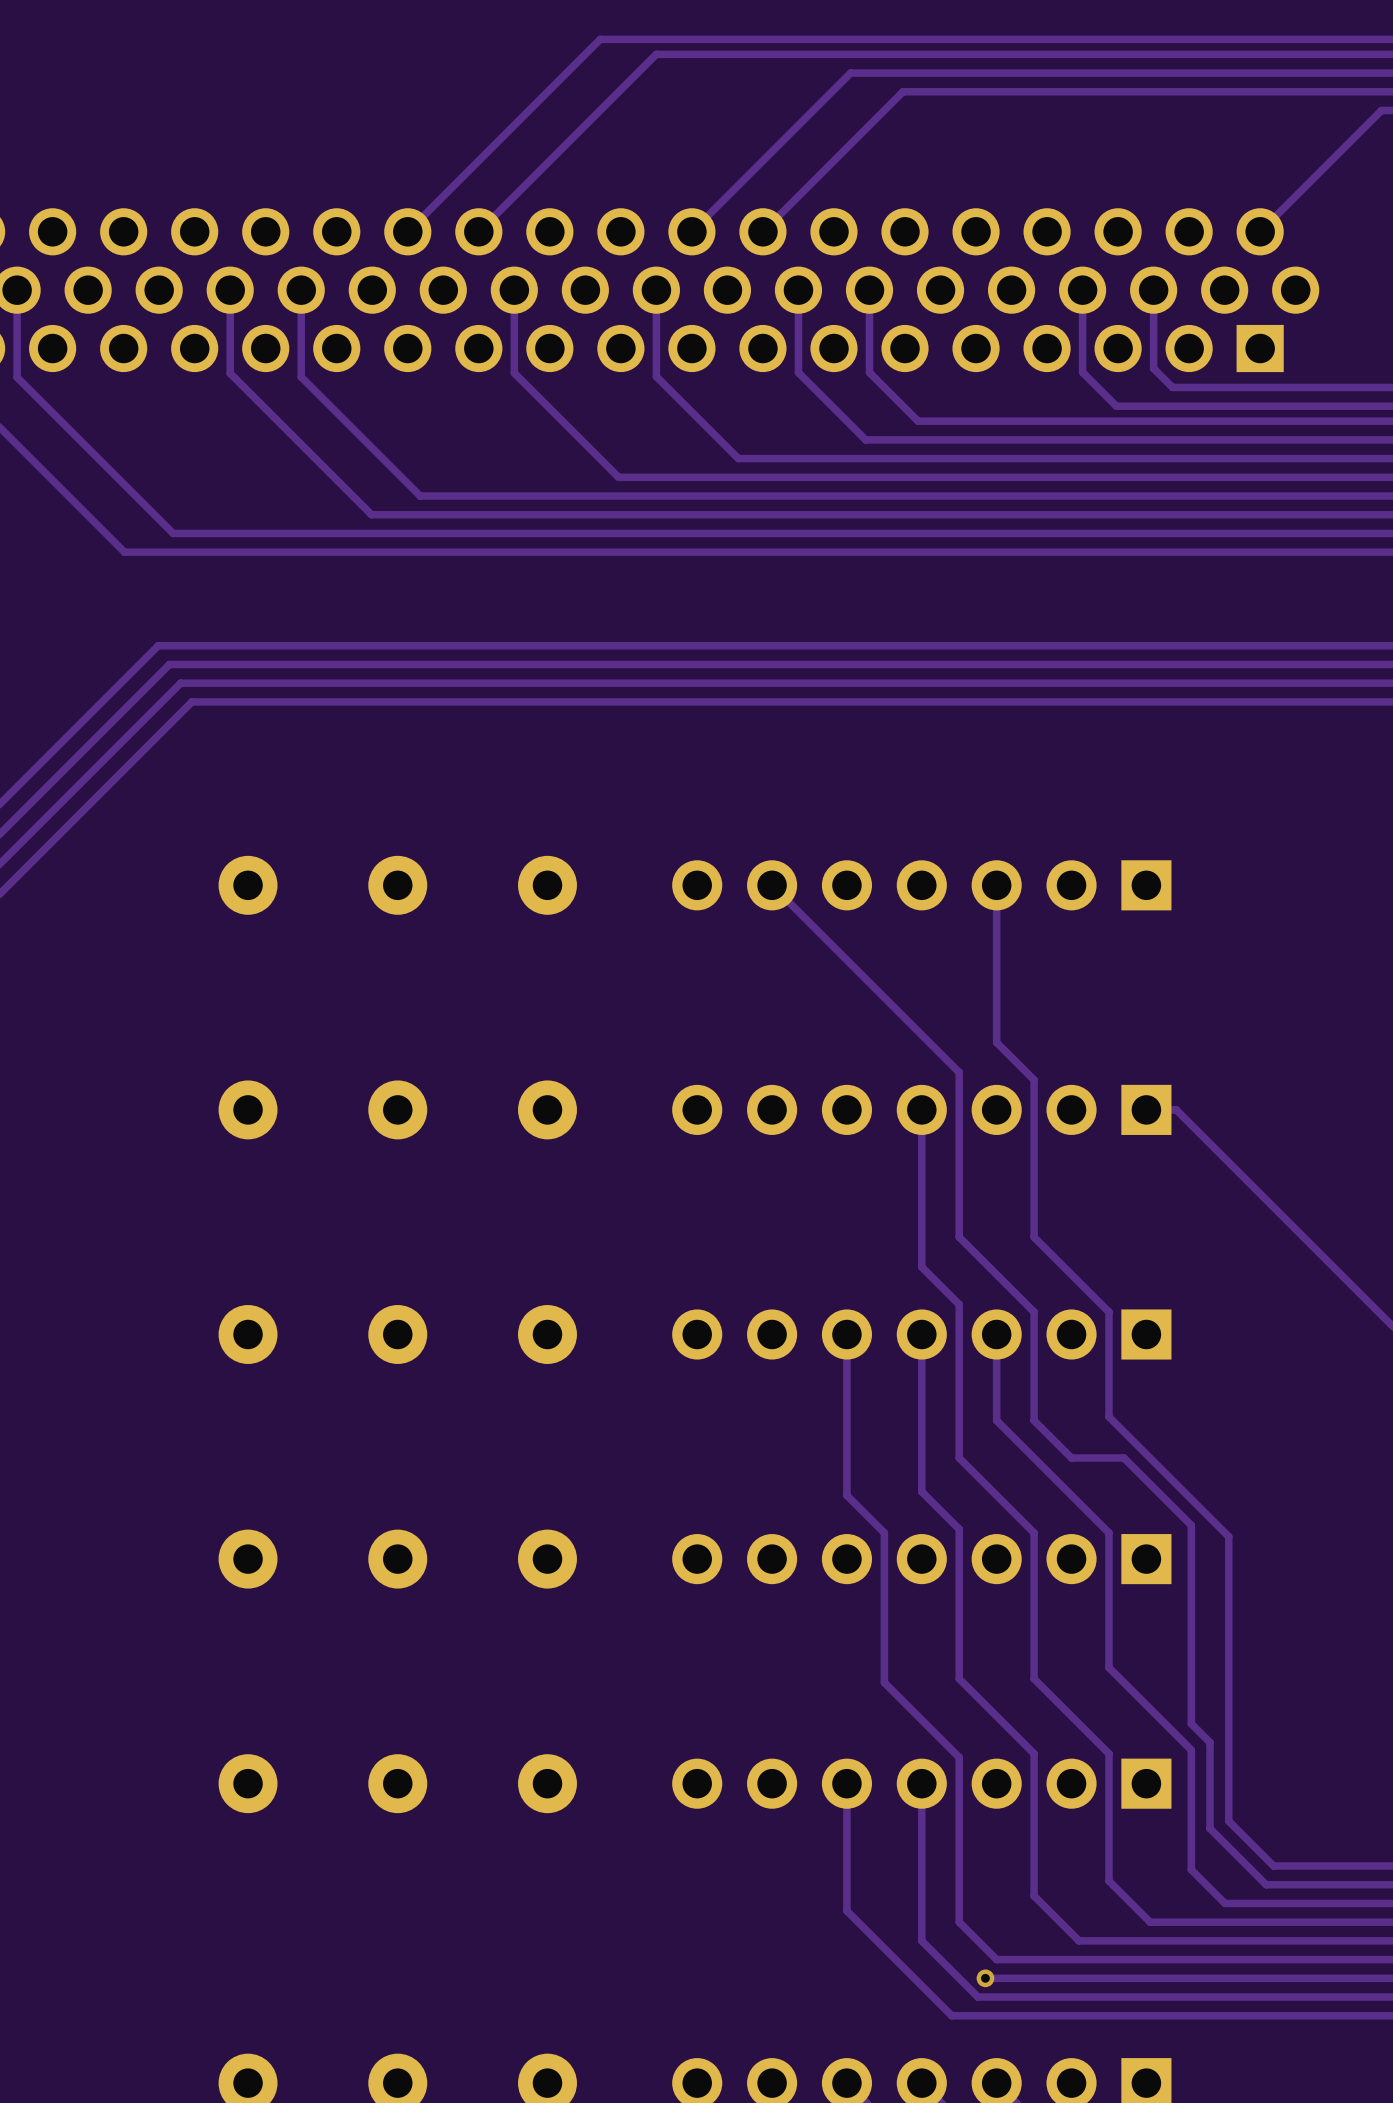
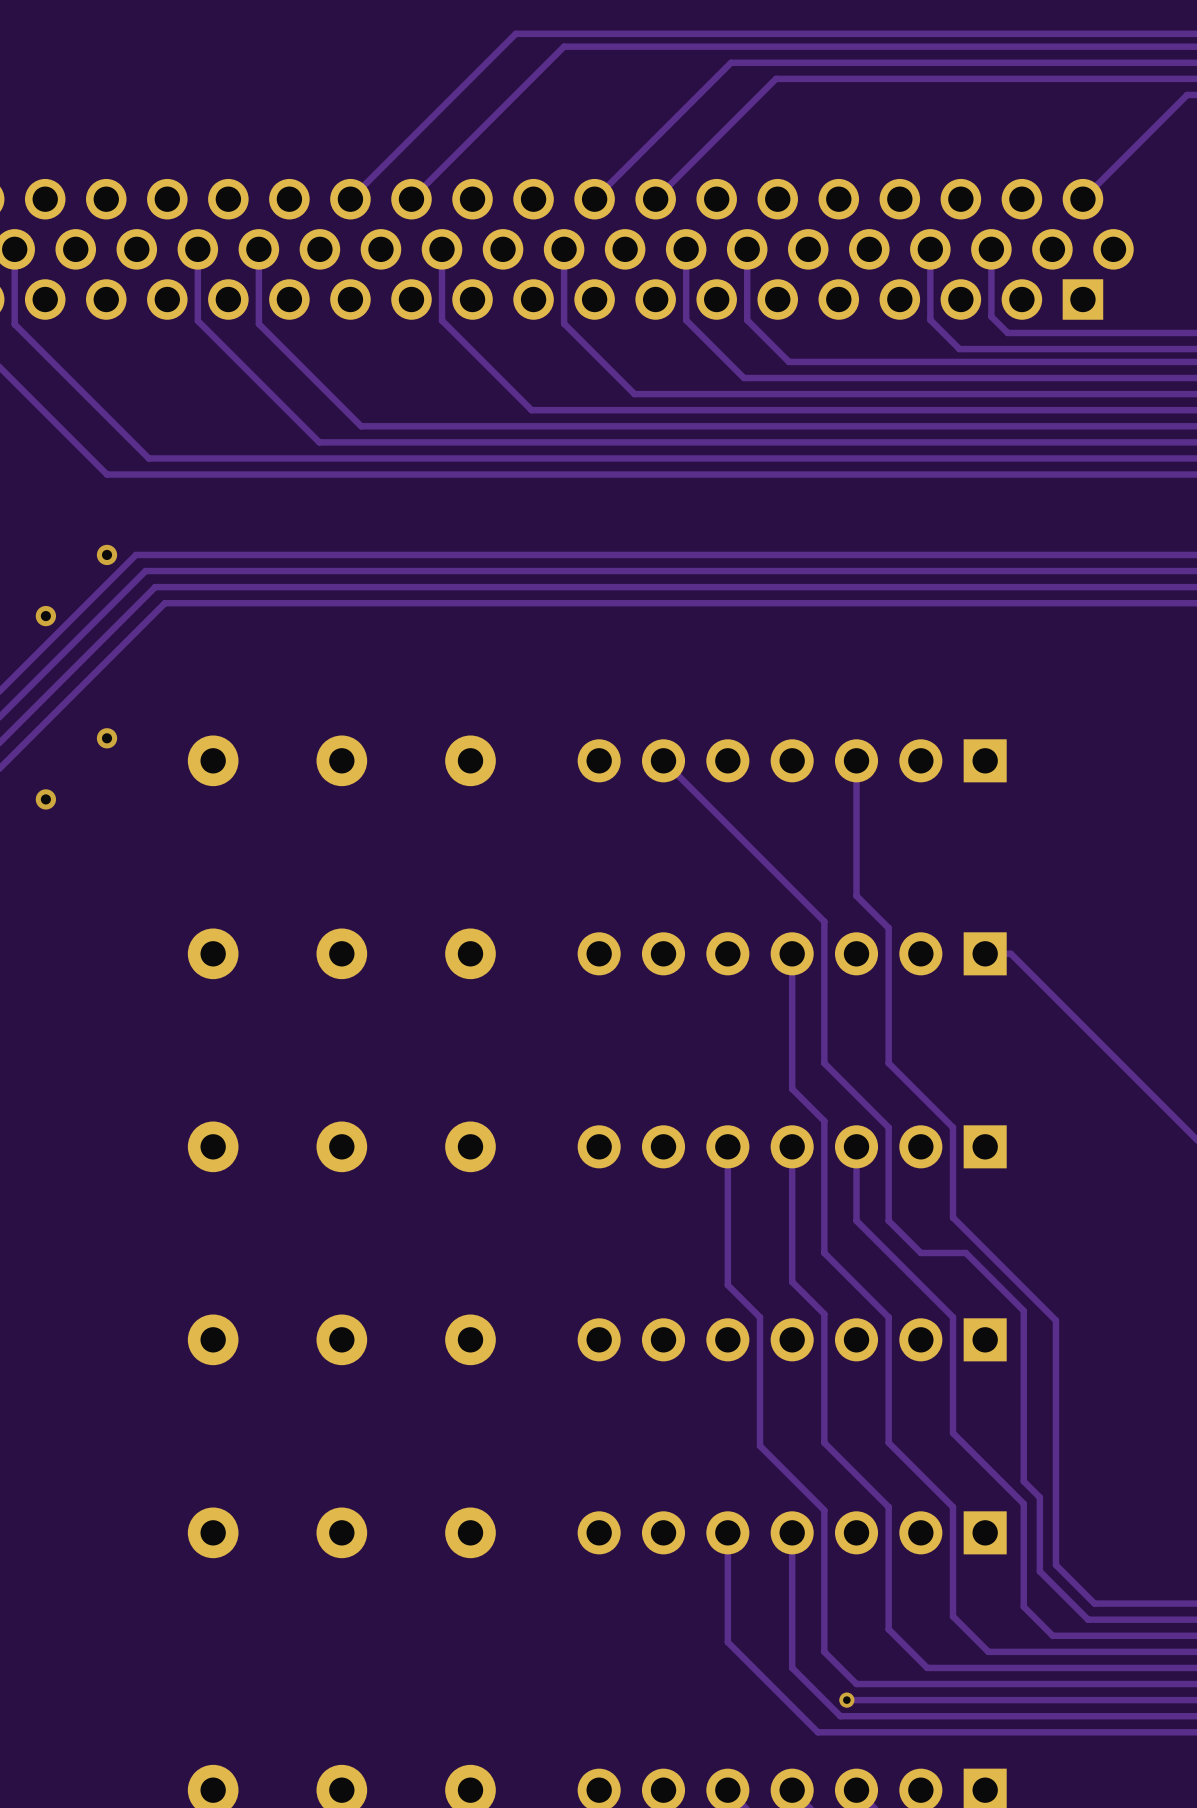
via: none -> (107, 554)
via: none -> (45, 616)
via: none -> (107, 738)
via: none -> (45, 799)

